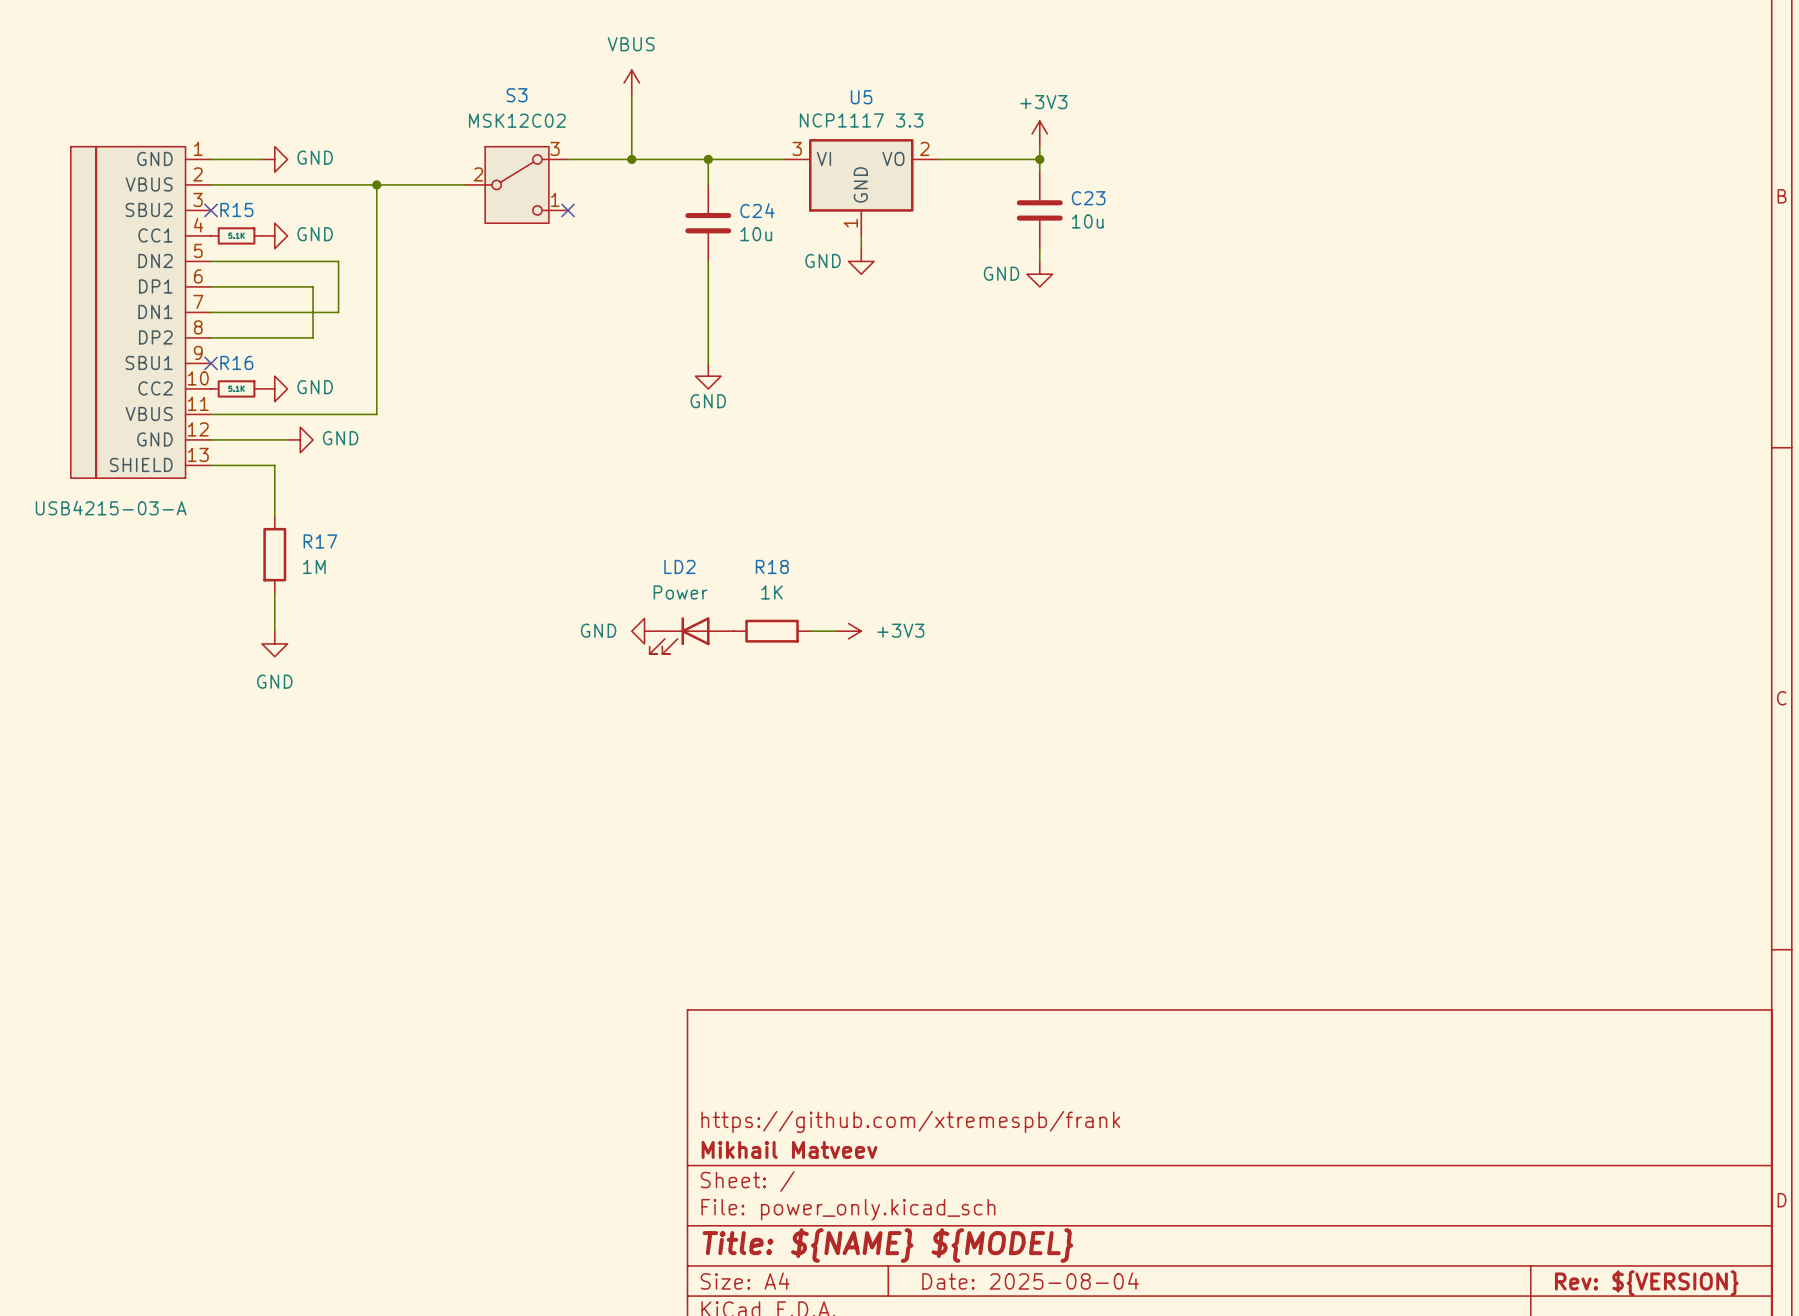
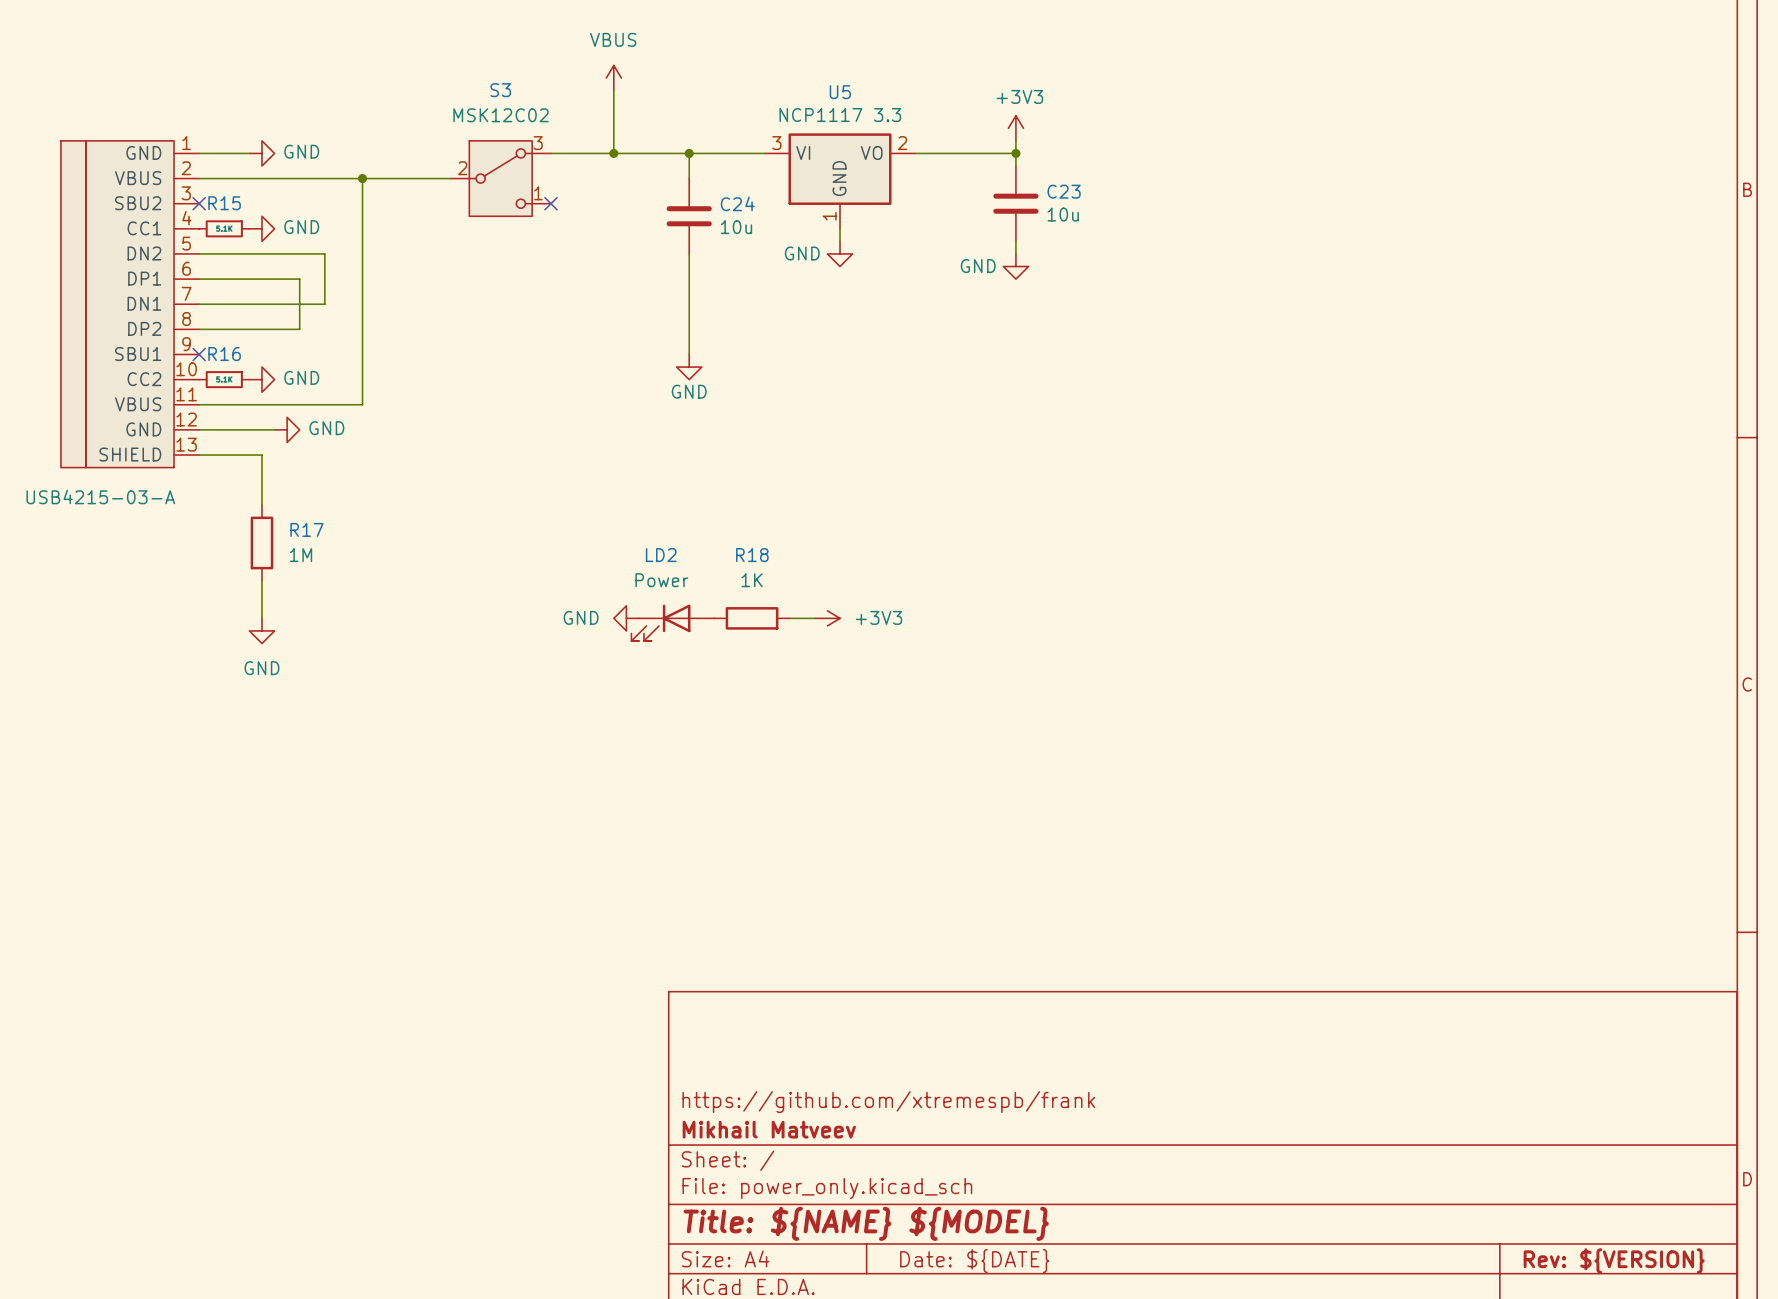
title block: Date: 2025-08-04 (1030, 1281) -> Date: ${DATE} (974, 1261)

